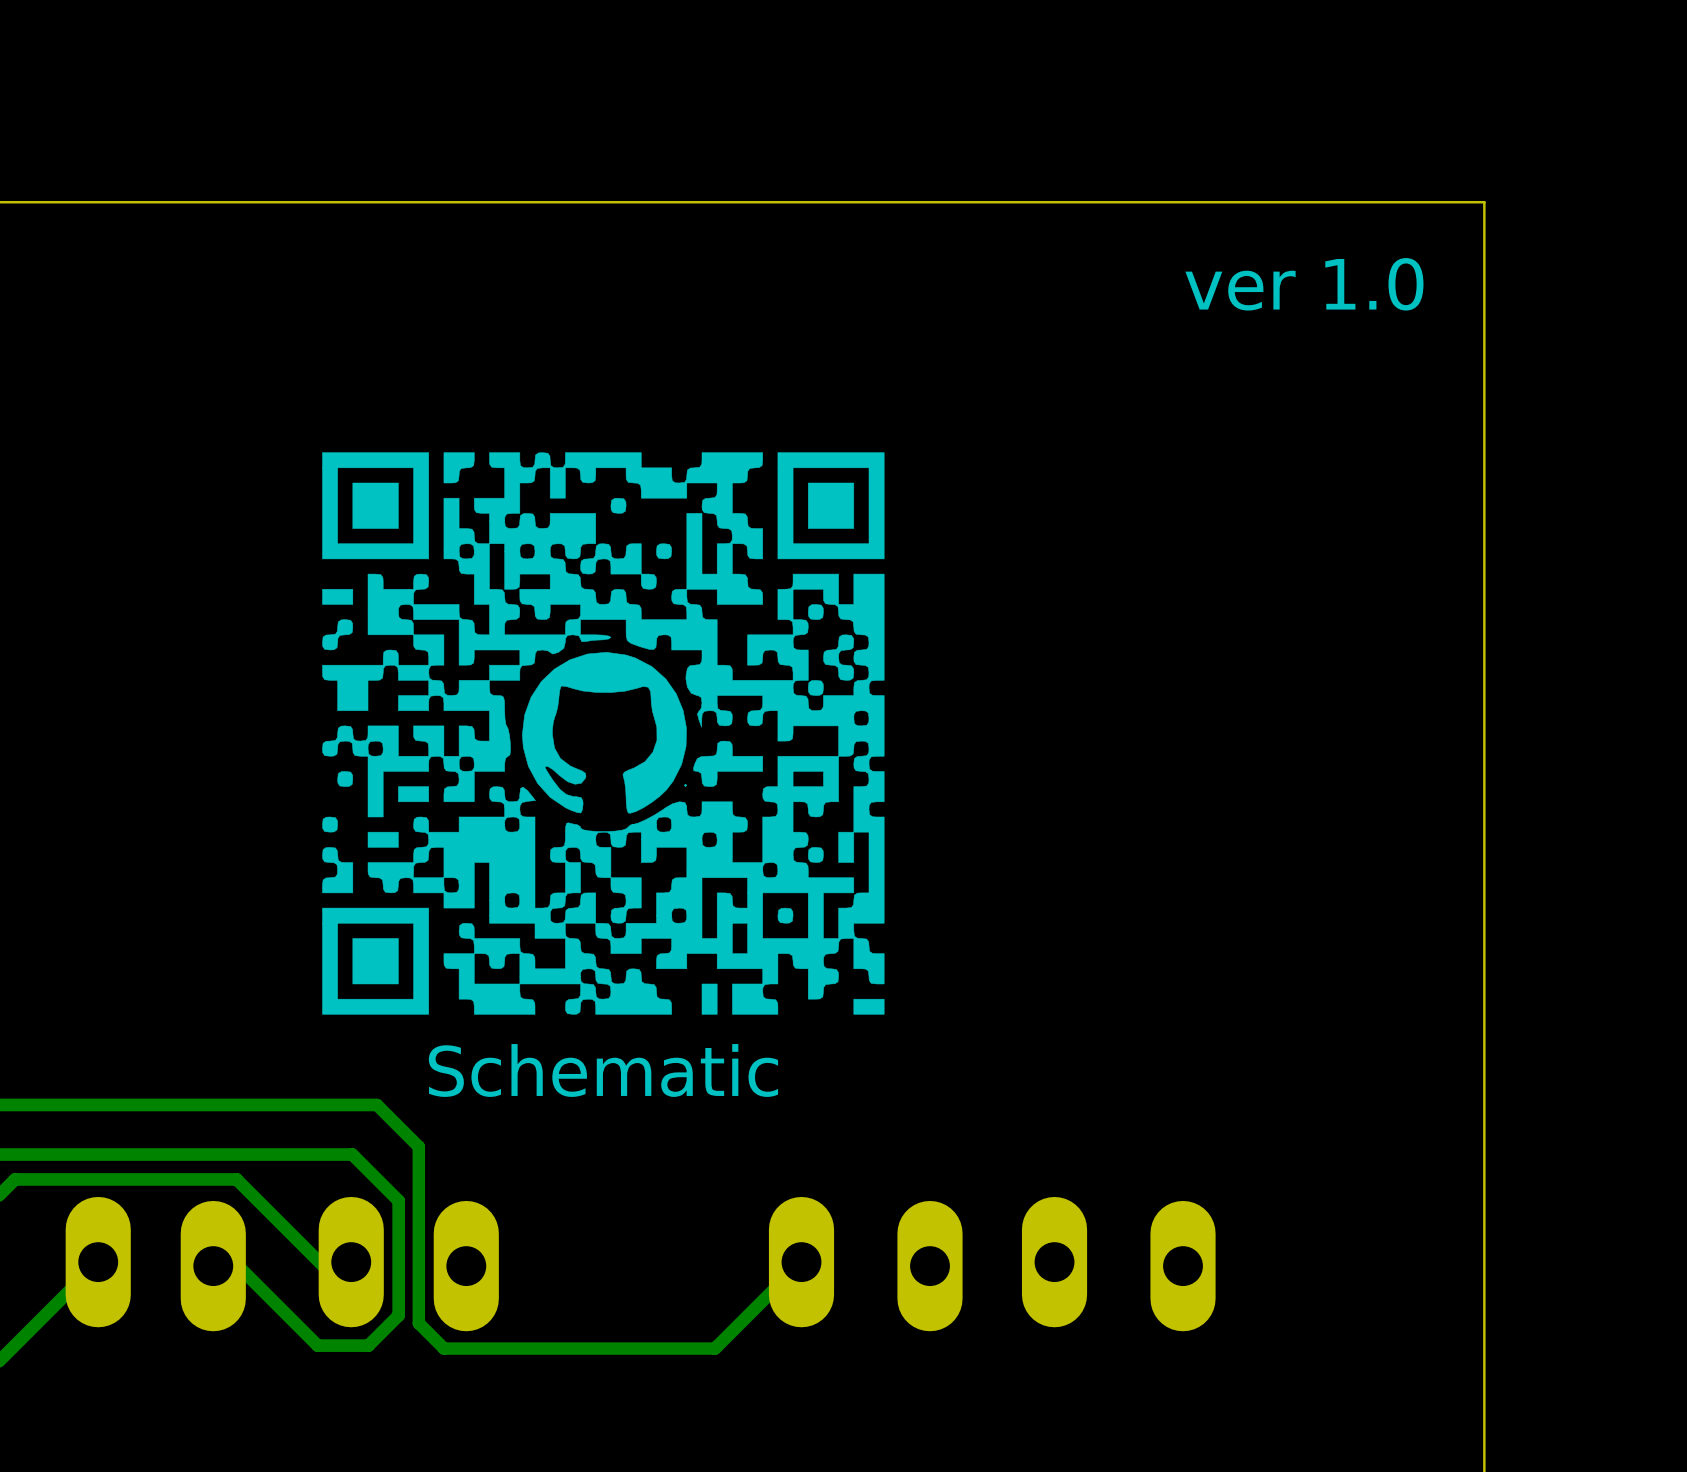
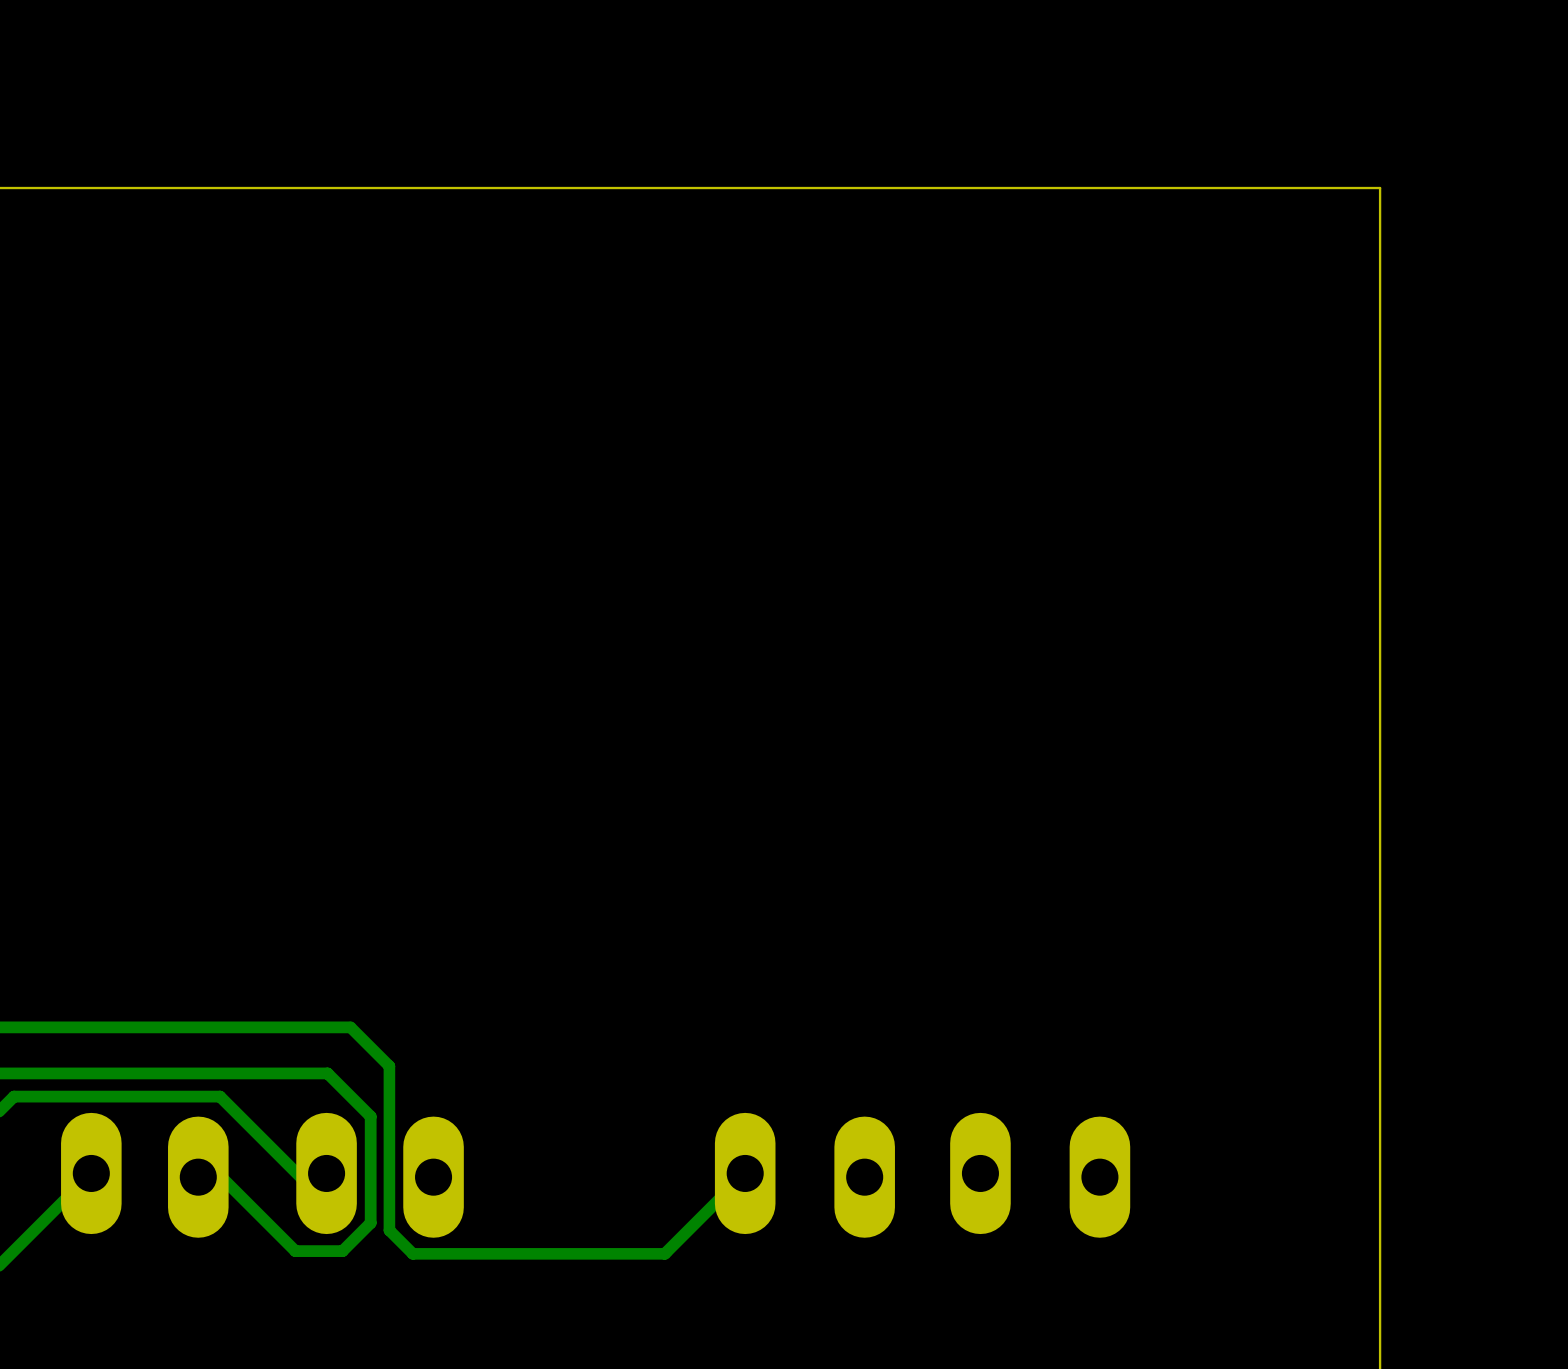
text: ver 1.0 (1304, 284) -> none
drawing: [322, 452, 885, 1015] -> none
text: Schematic (603, 1070) -> none

